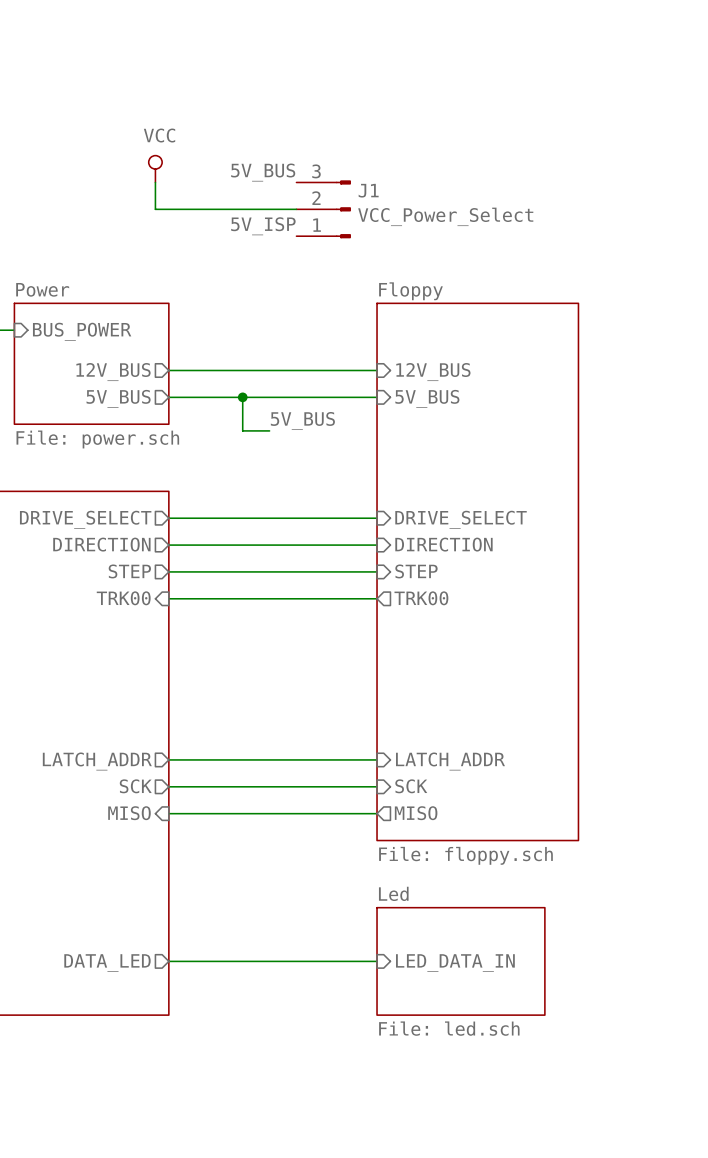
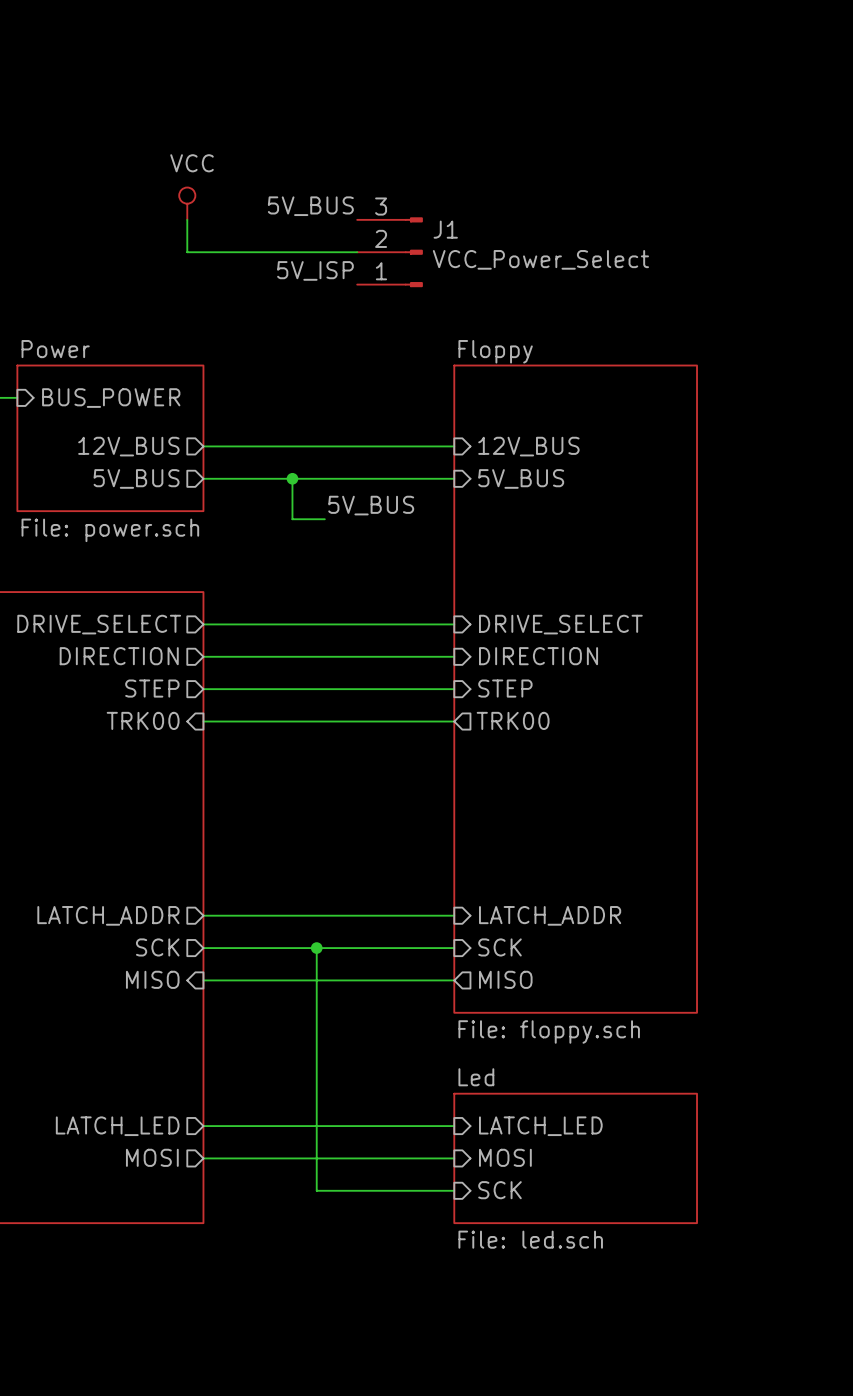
wire: none -> (316, 948) (316, 1190) (454, 1190)
junction: none -> (316, 948)
wire: none -> (203, 1126) (454, 1126)
sheet pin: none -> LATCH_LED (117, 1126)
sheet pin: none -> LATCH_LED (540, 1126)
sheet Led: File: led.sch (460, 961) -> none
sheet Led: none -> File: led.sch (575, 1158)
sheet pin: DATA_LED (107, 963) -> MOSI (152, 1157)
sheet pin: LED_DATA_IN (455, 963) -> MOSI (505, 1157)
sheet pin: none -> SCK (500, 1190)

